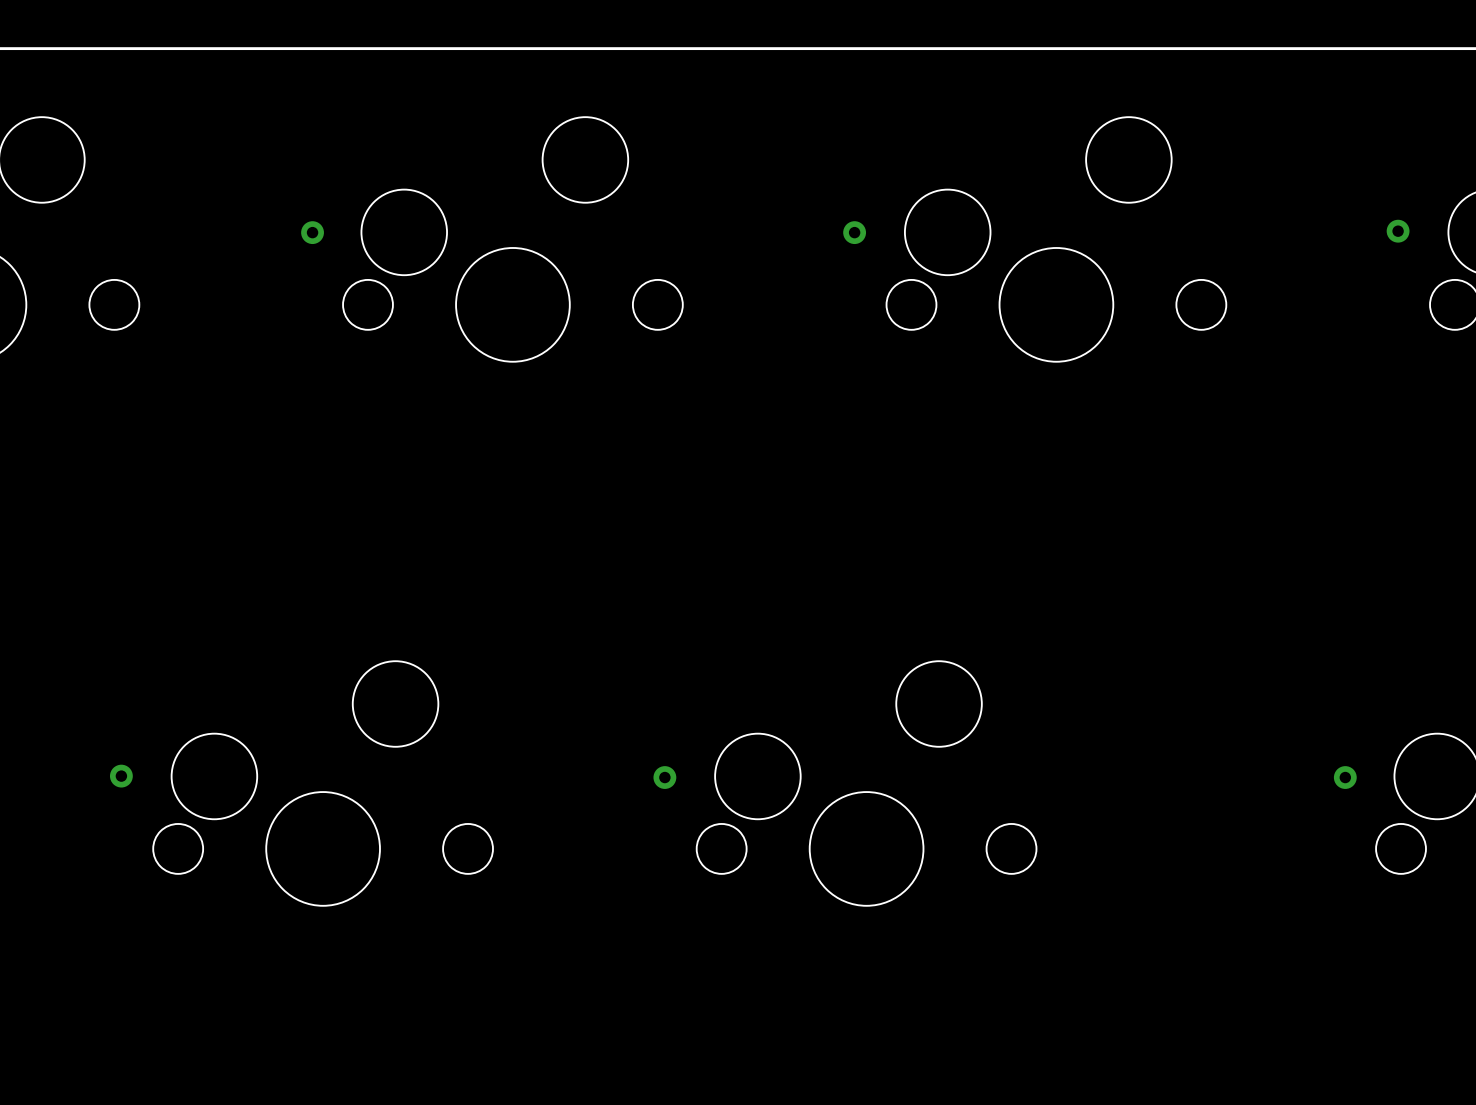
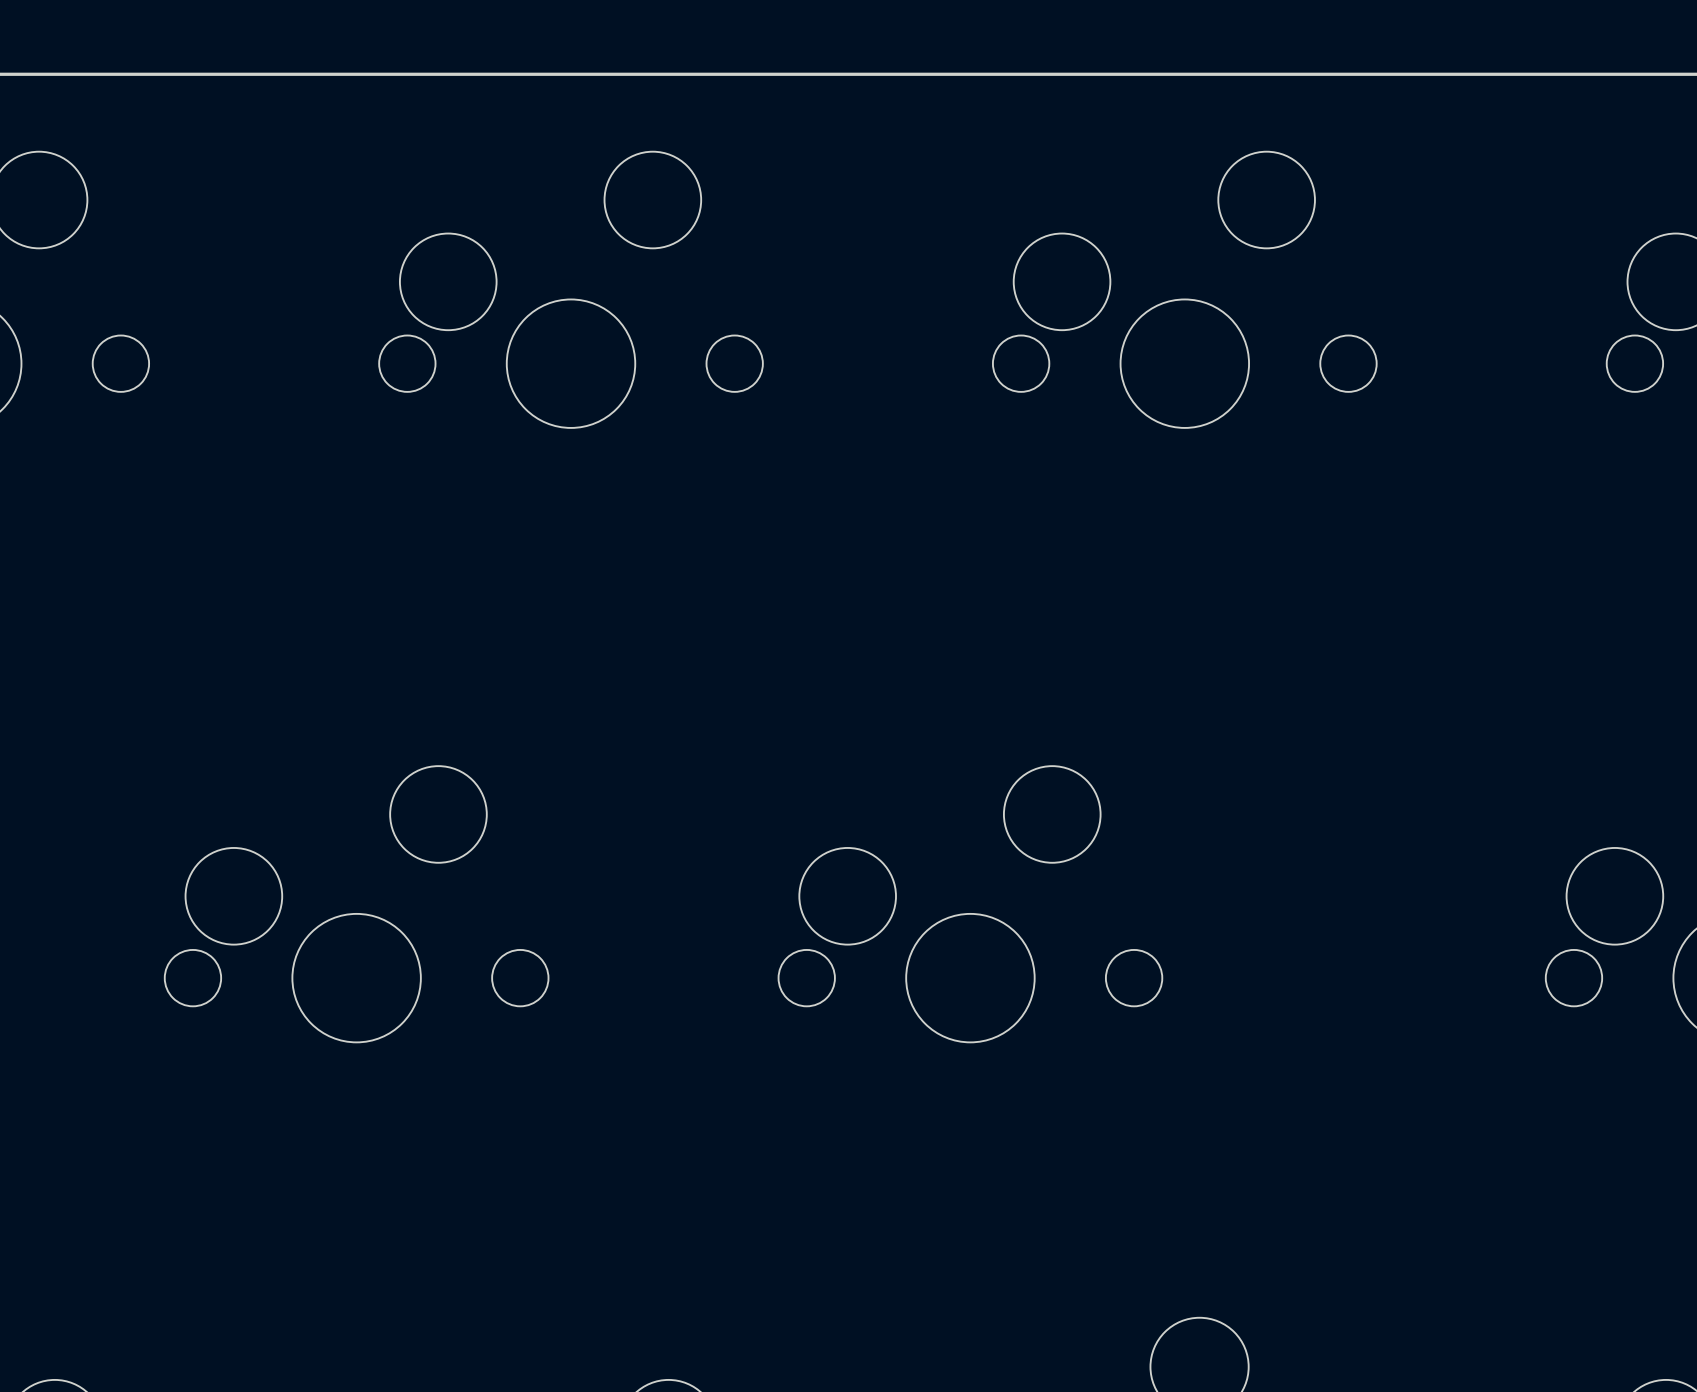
via: (1398, 231) -> none
via: (312, 232) -> none
via: (854, 232) -> none
via: (121, 776) -> none
via: (664, 777) -> none
via: (1345, 777) -> none

